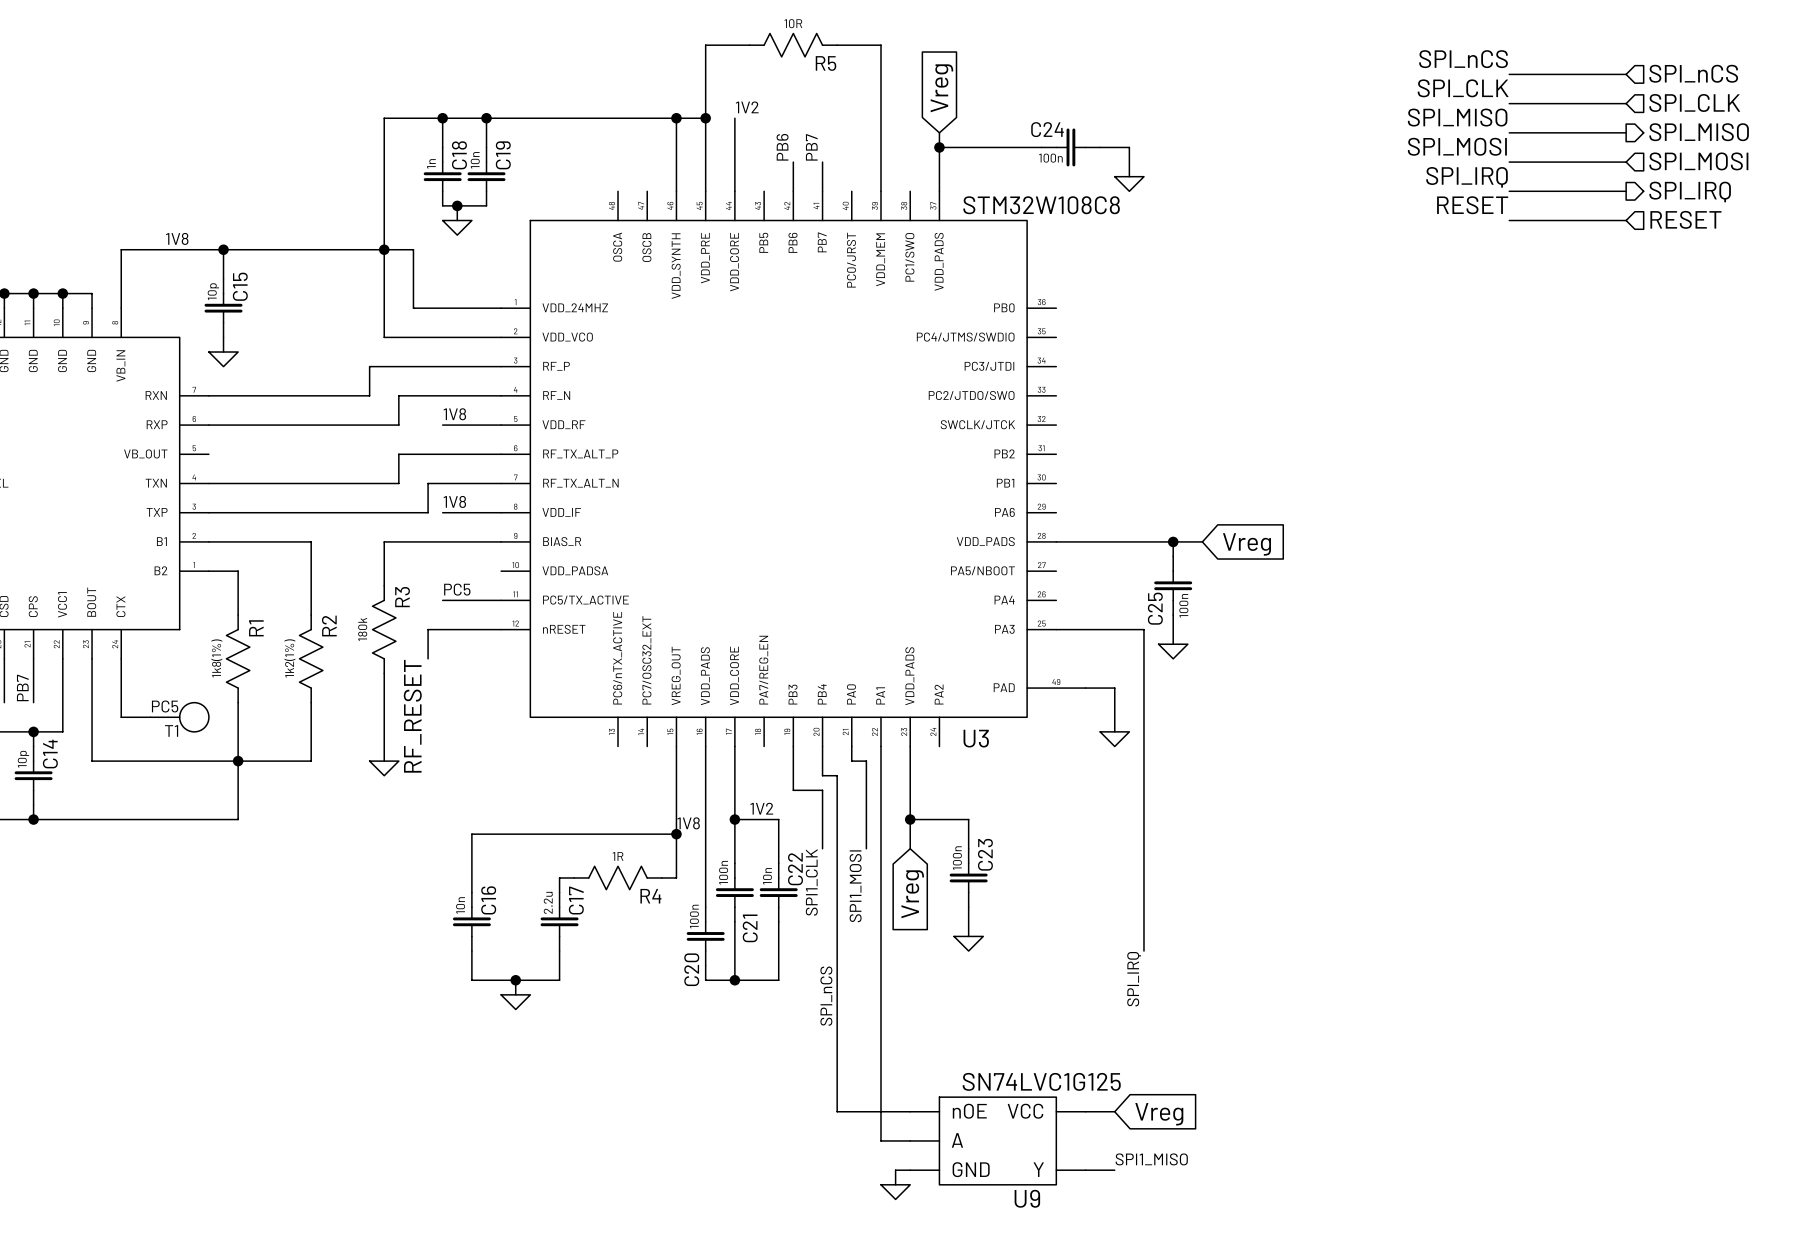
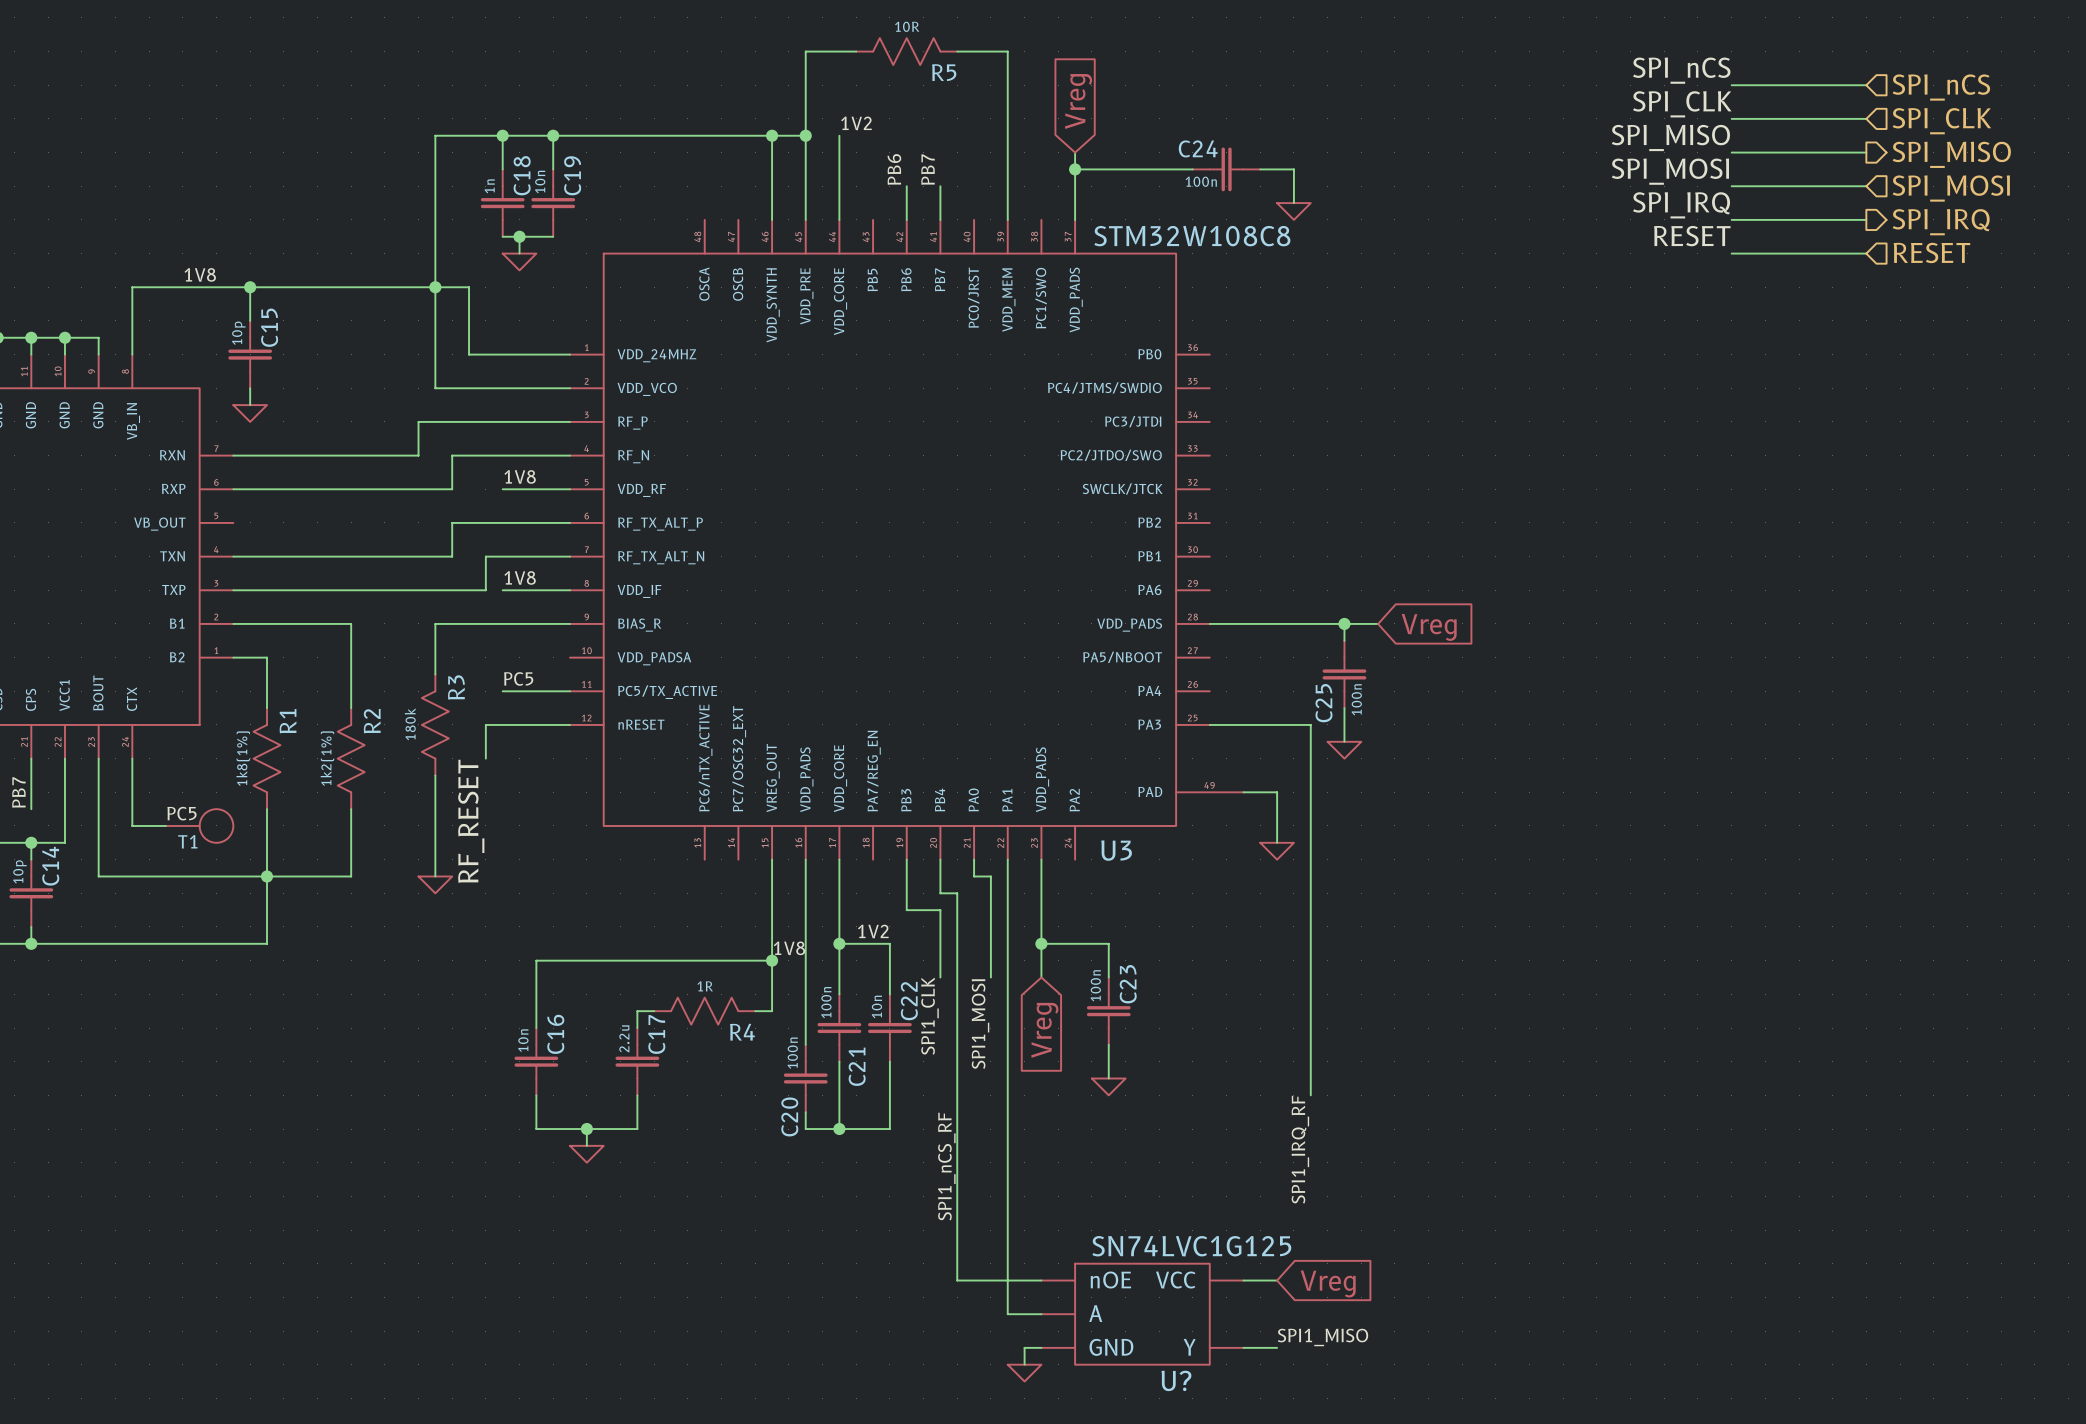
label: SPI_IRQ (1134, 979) -> SPI1_IRQ_RF (1300, 1149)
label: SPI_nCS (826, 996) -> SPI1_nCS_RF (946, 1166)
U9 name: U9 (1027, 1198) -> U? (1176, 1380)

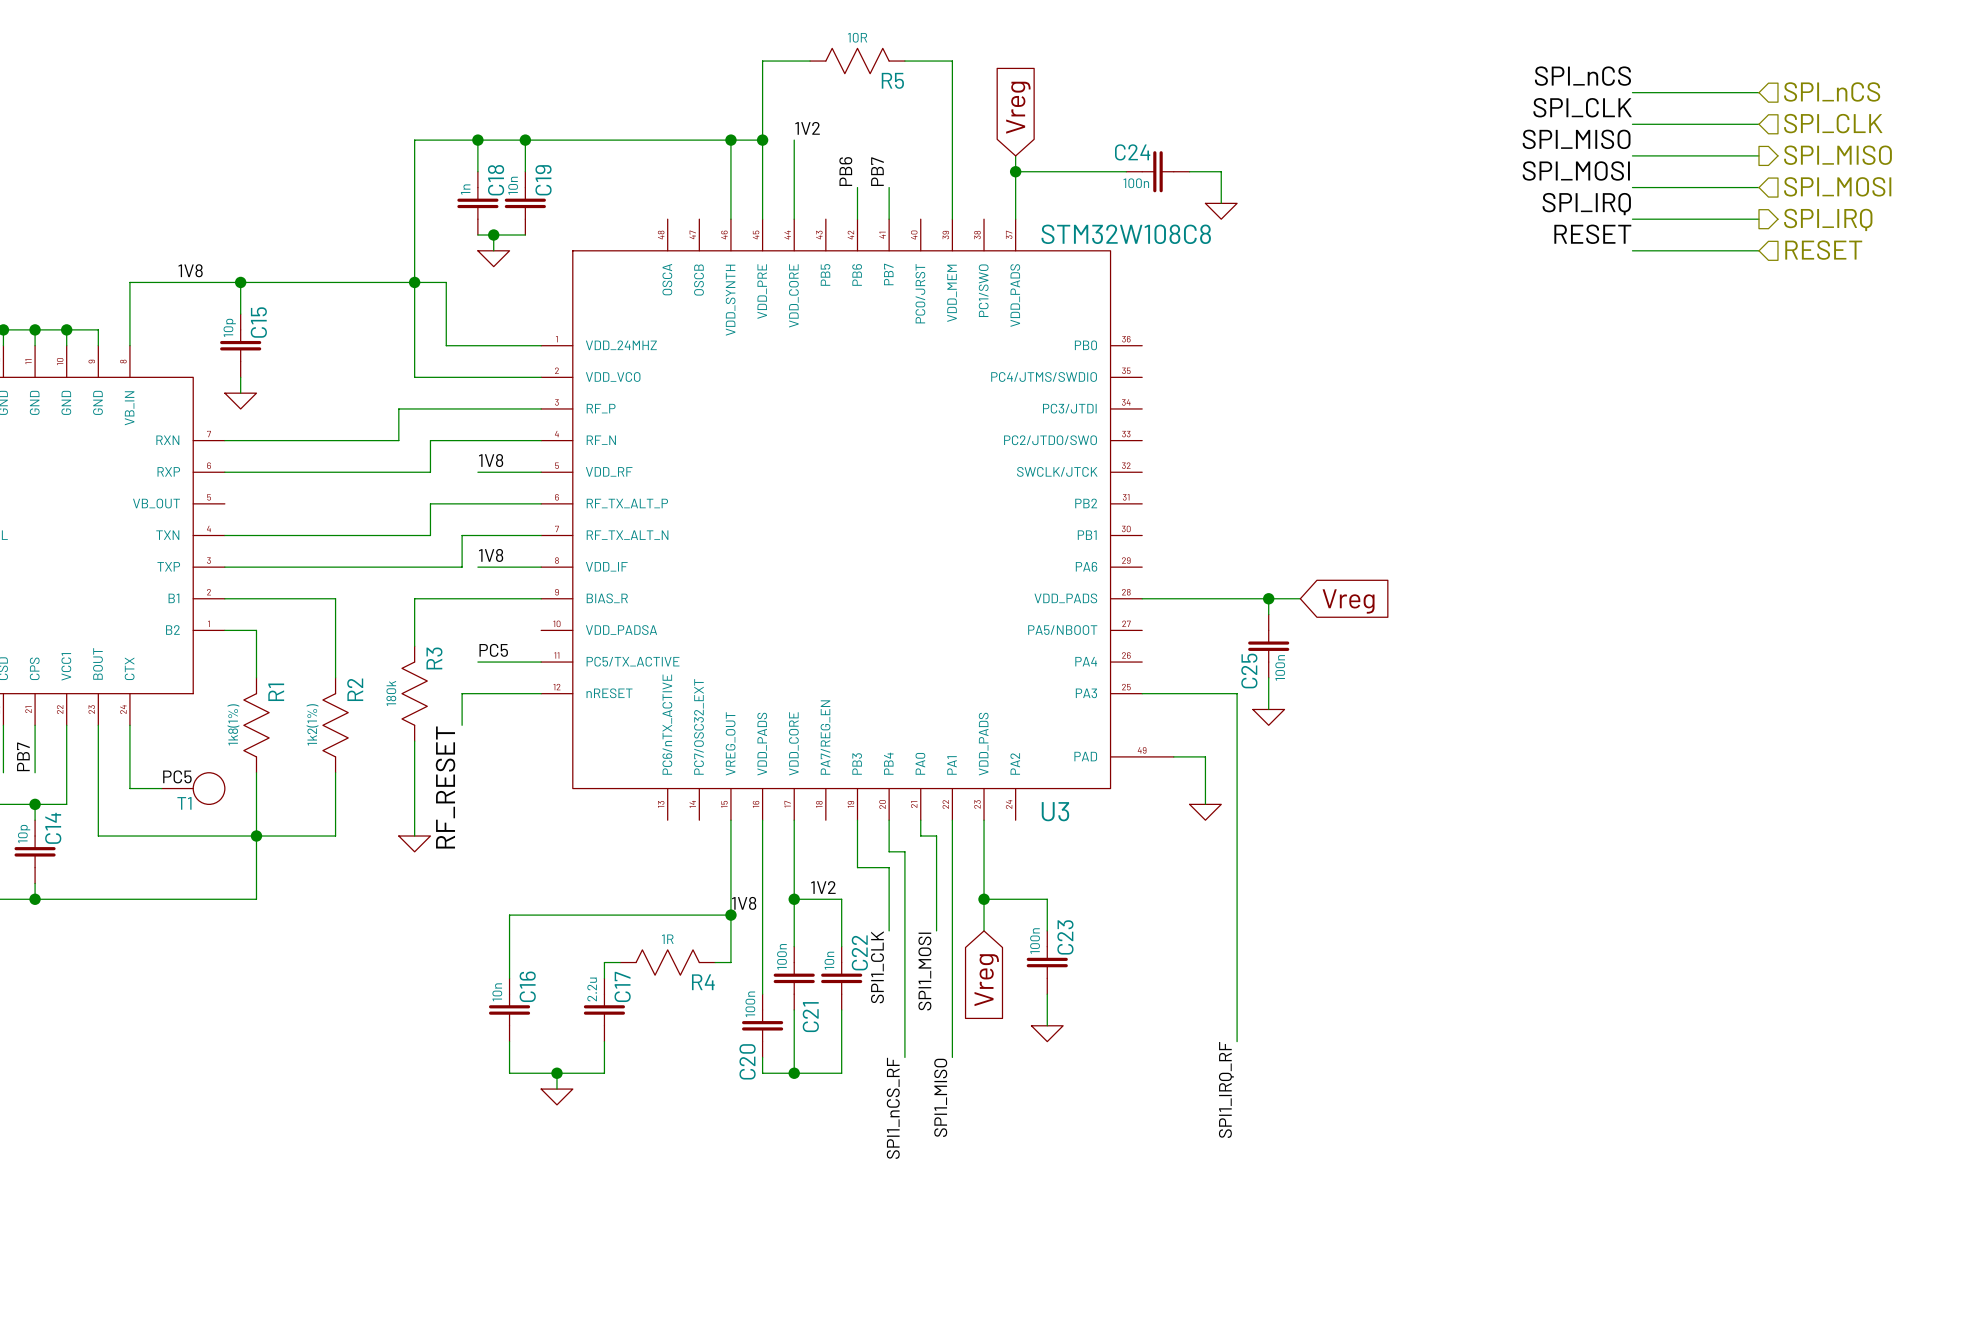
wire: (957, 1112) (957, 1280) (1041, 1280) -> none
wire: (1007, 1112) (1007, 1314) (1041, 1314) -> none
label: none -> SPI1_MISO (940, 1097)
wire: (1243, 1280) (1277, 1280) -> none
global label: Vreg (1328, 1283) -> none
U?: SN74LVC1G125 (1142, 1314) -> none
label: SPI1_MISO (1323, 1337) -> none
wire: (1041, 1347) (1024, 1347) (1024, 1364) -> none
wire: (1243, 1347) (1277, 1347) -> none
power symbol: (1024, 1373) -> none

